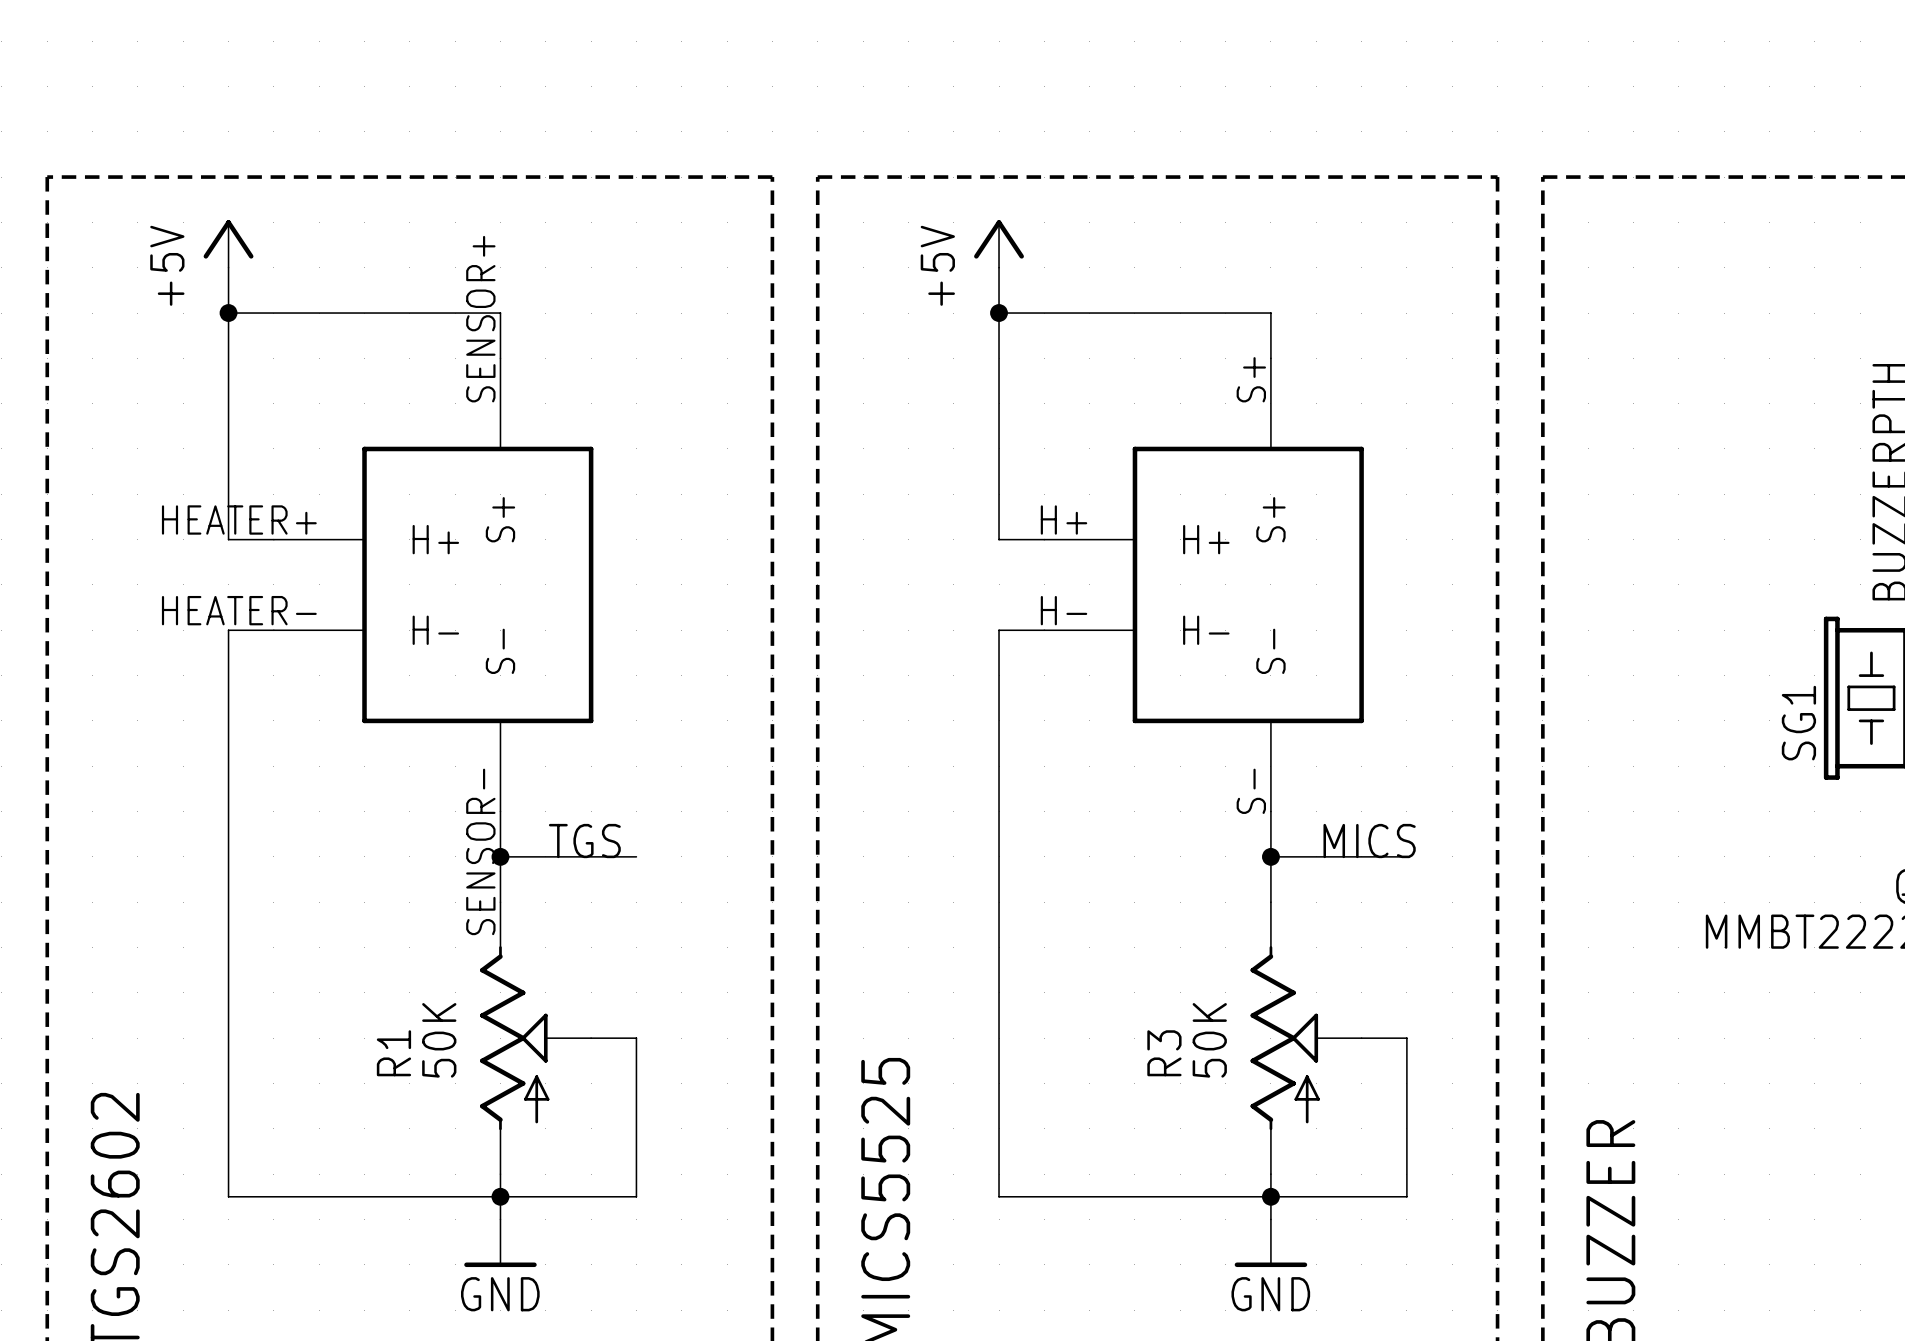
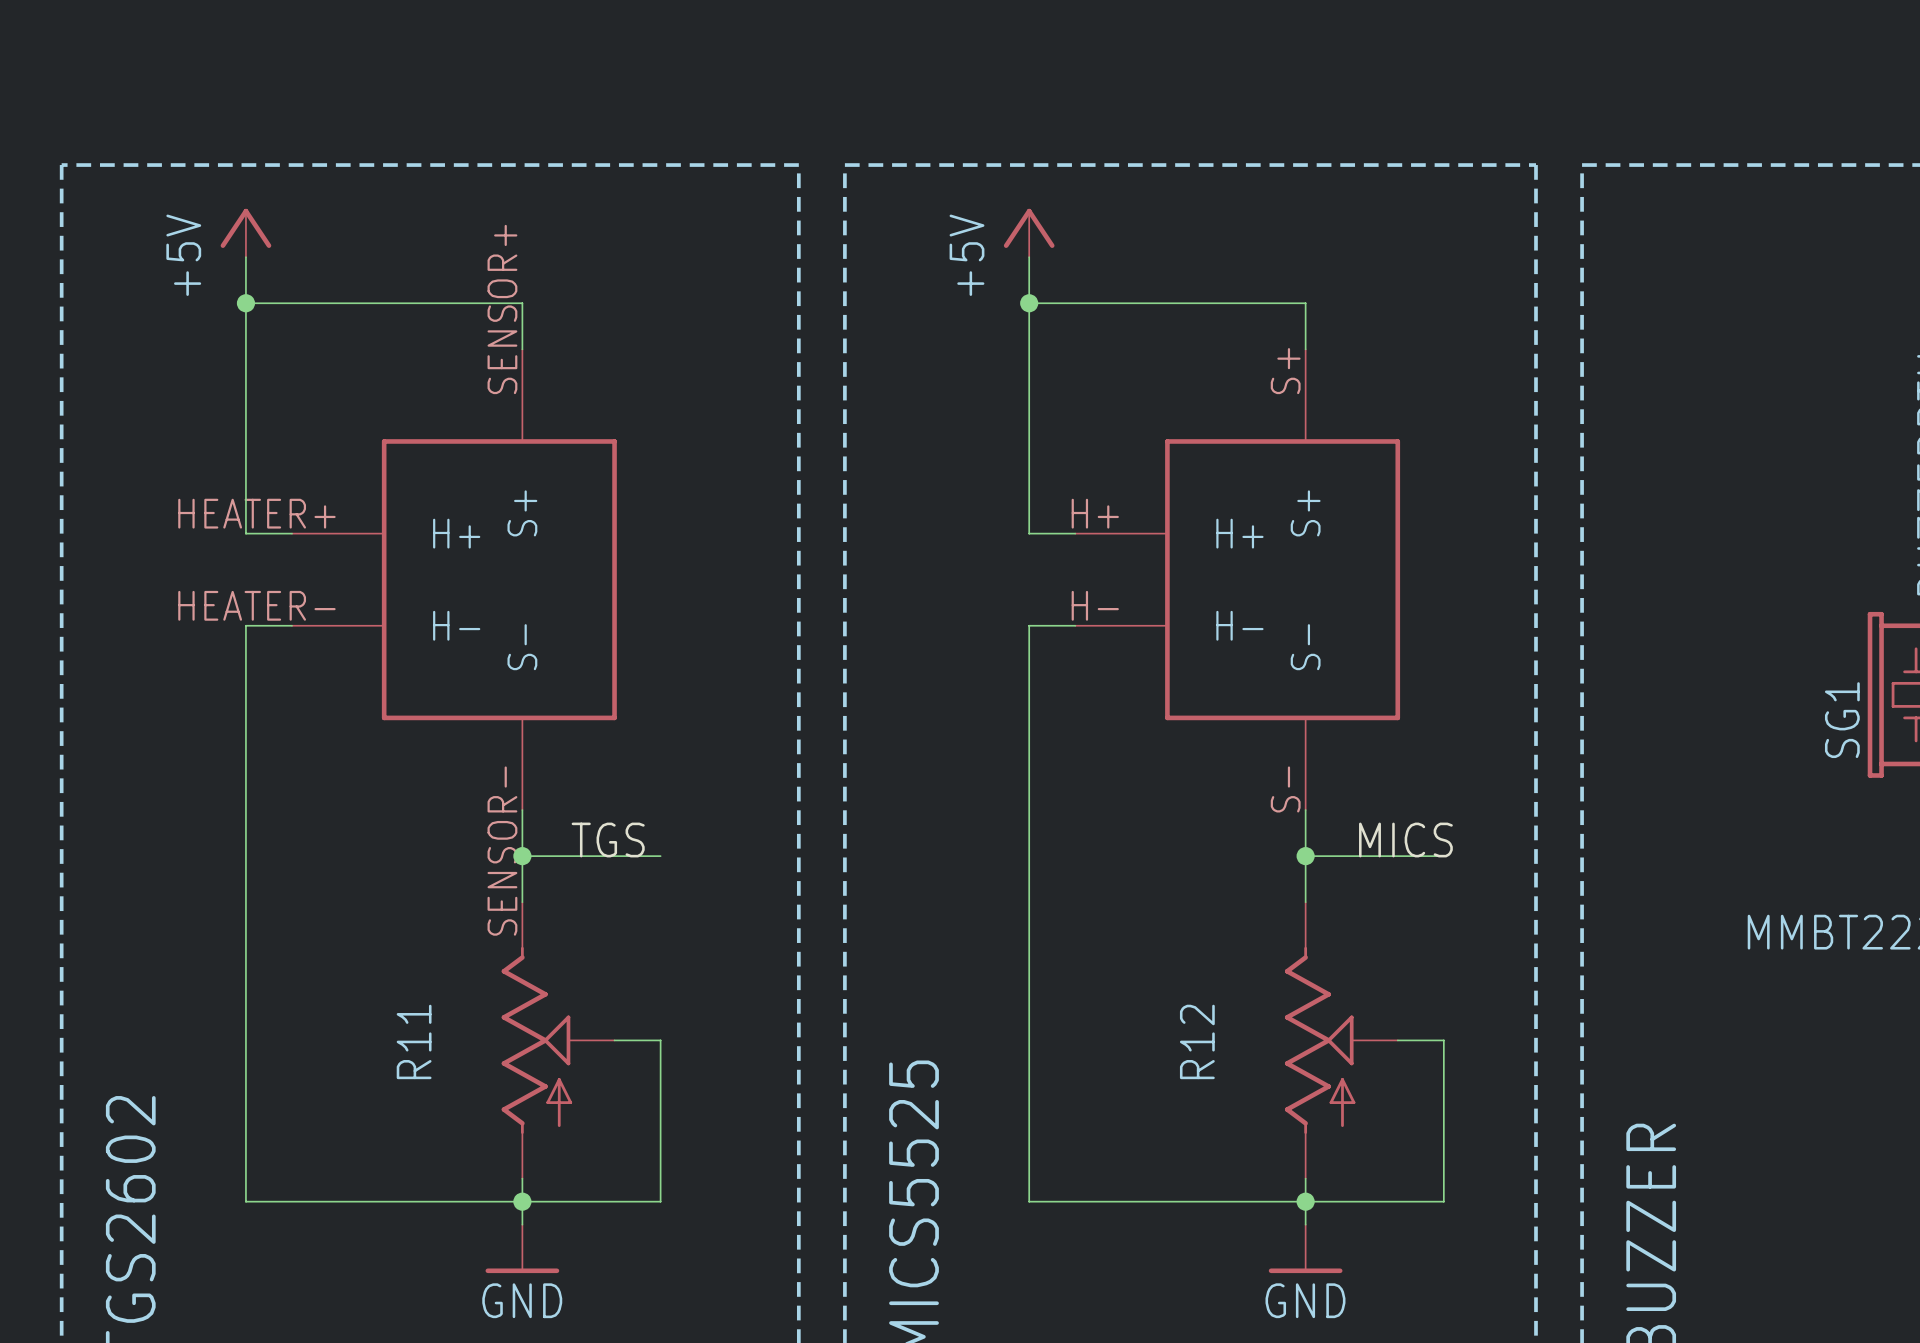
R1 value: 50K (439, 1040) -> none
R3 value: 50K (1209, 1040) -> none
R1 name: R1 (393, 1053) -> R11 (414, 1041)
R3 name: R3 (1164, 1053) -> R12 (1197, 1041)

